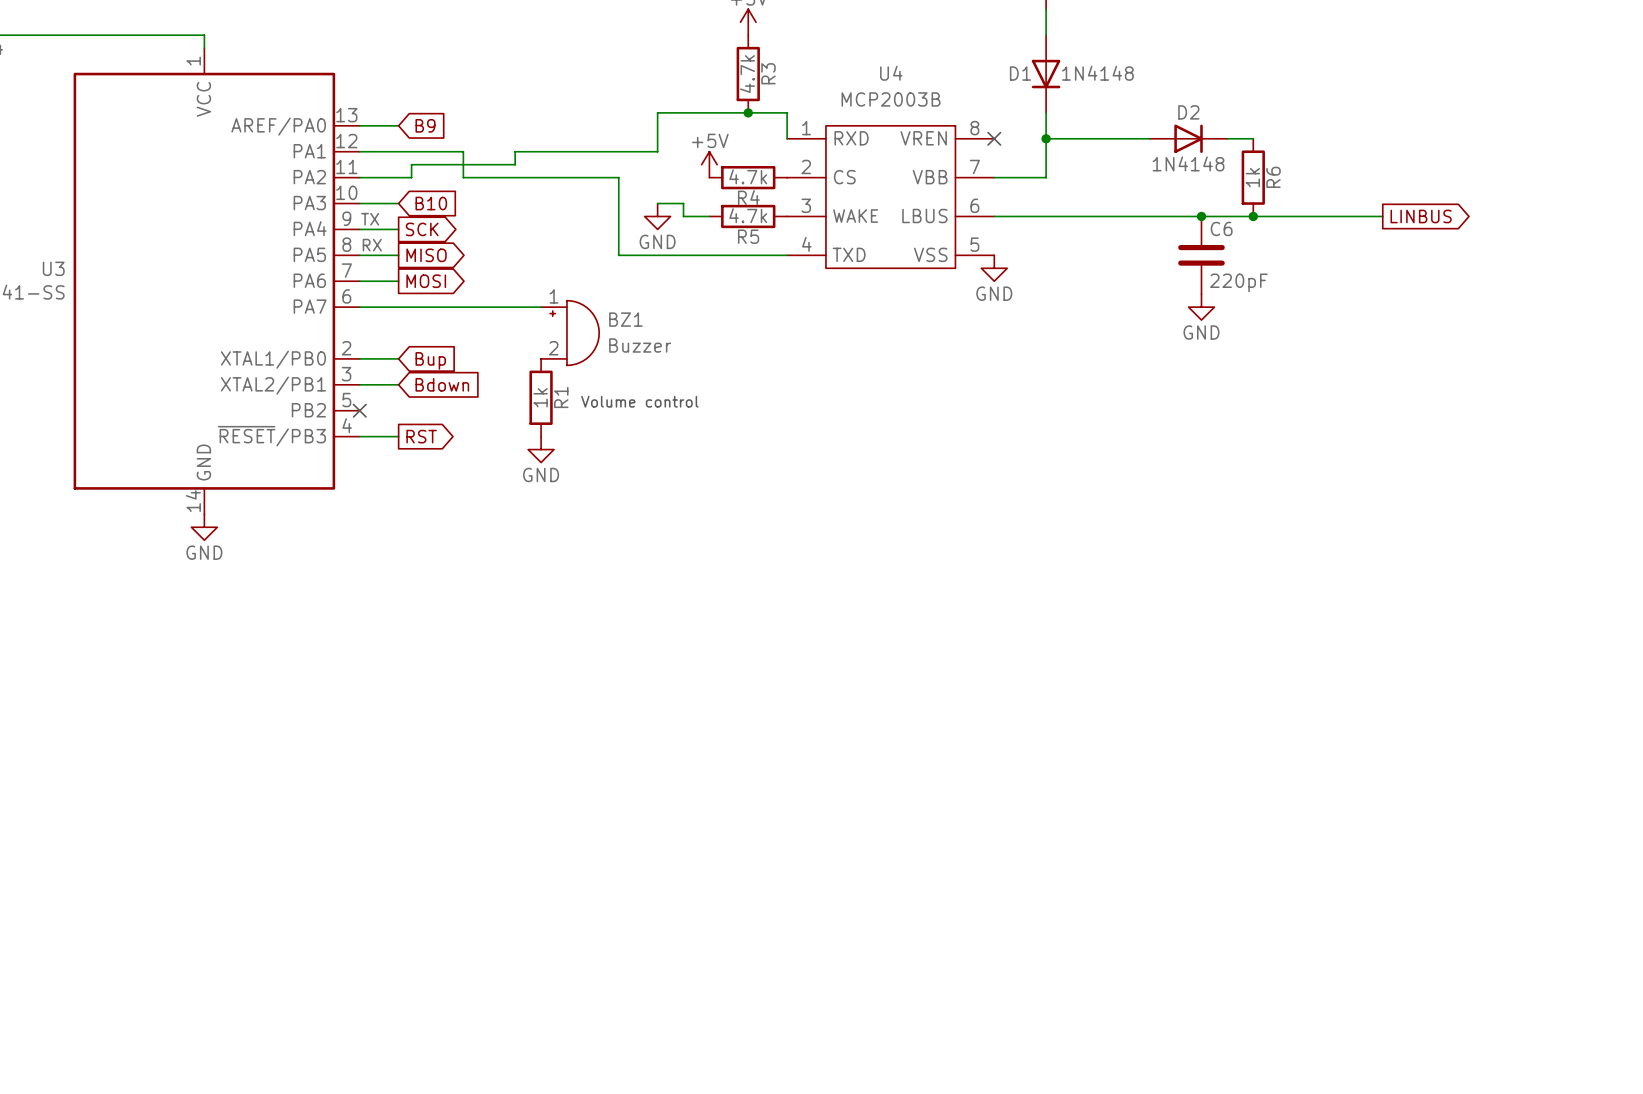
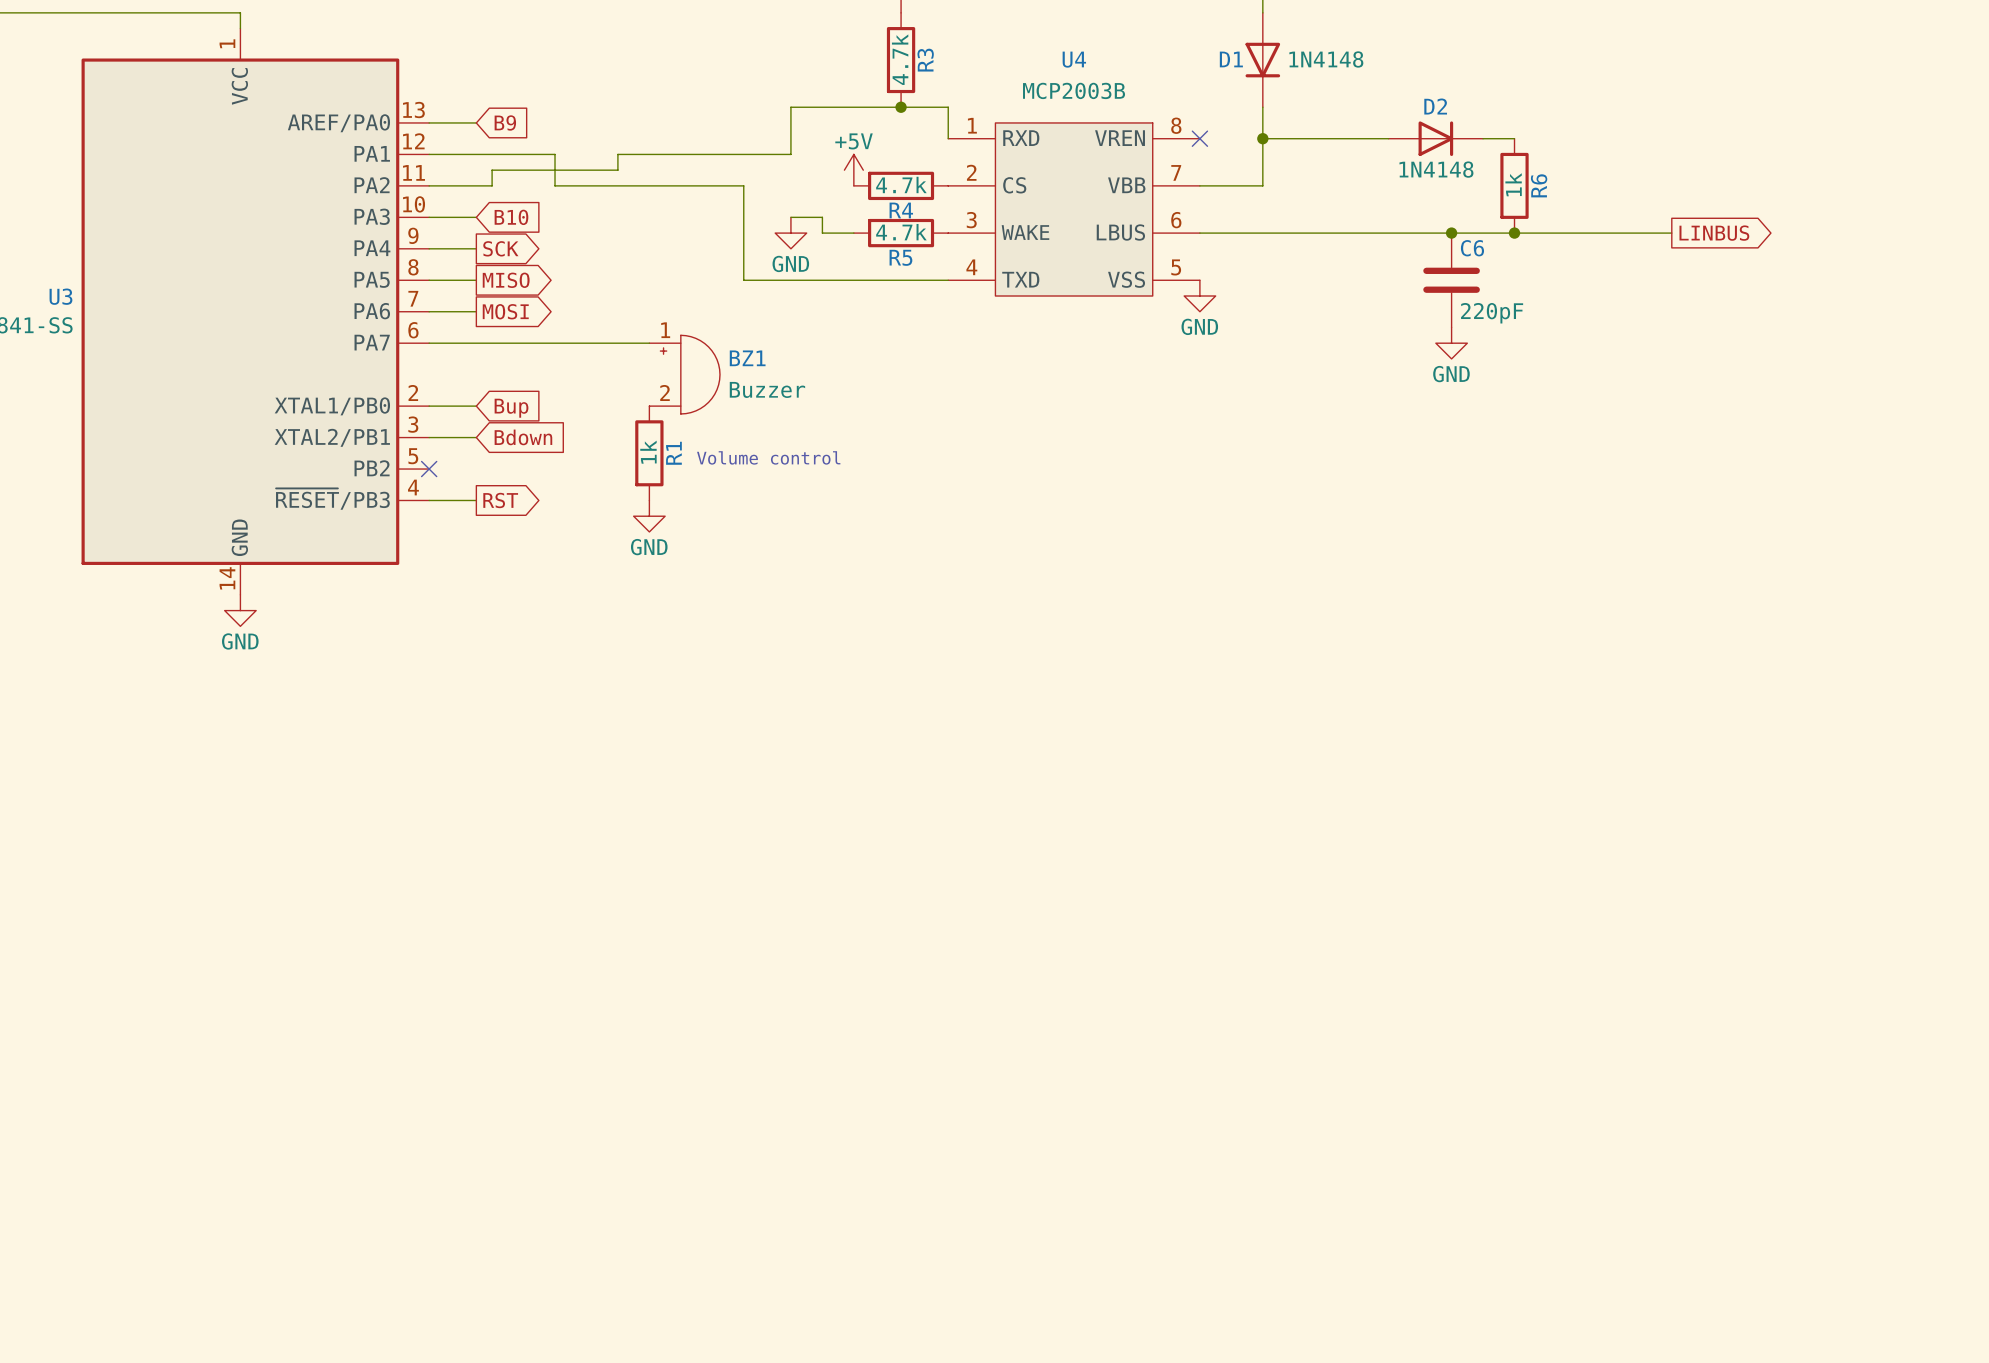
label: TX (370, 219) -> none
label: RX (372, 245) -> none

